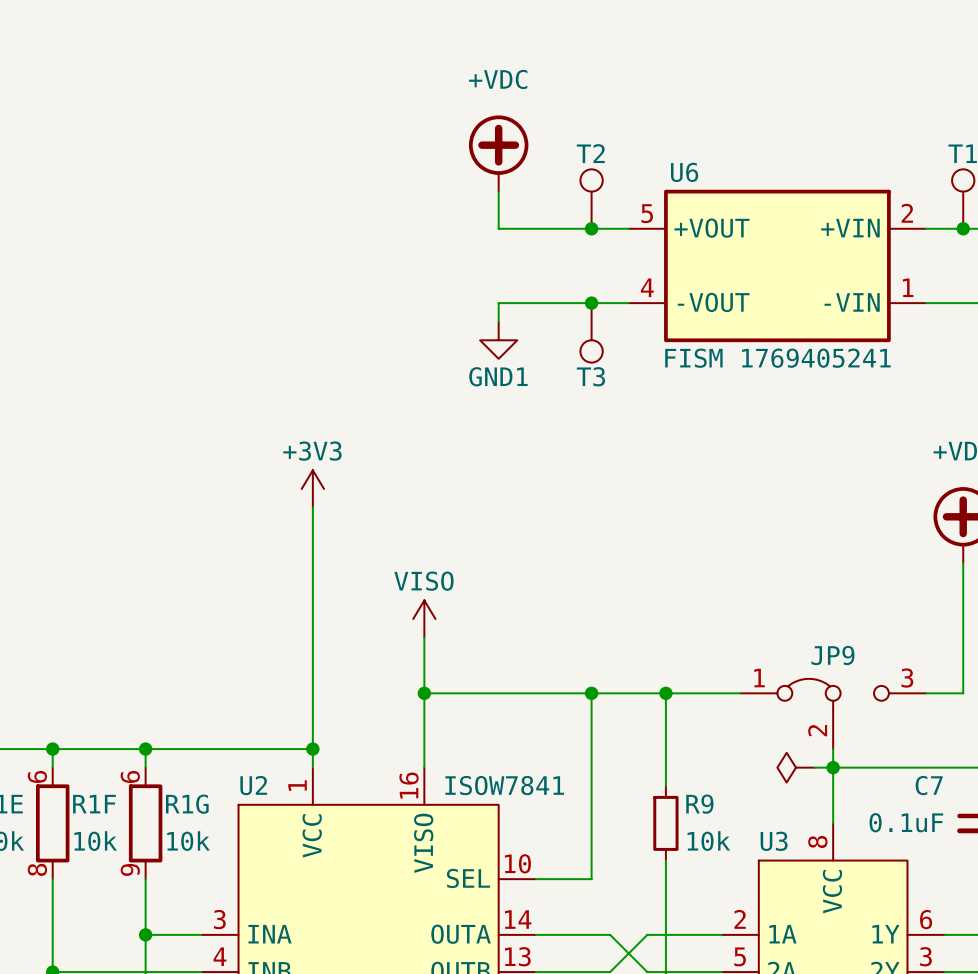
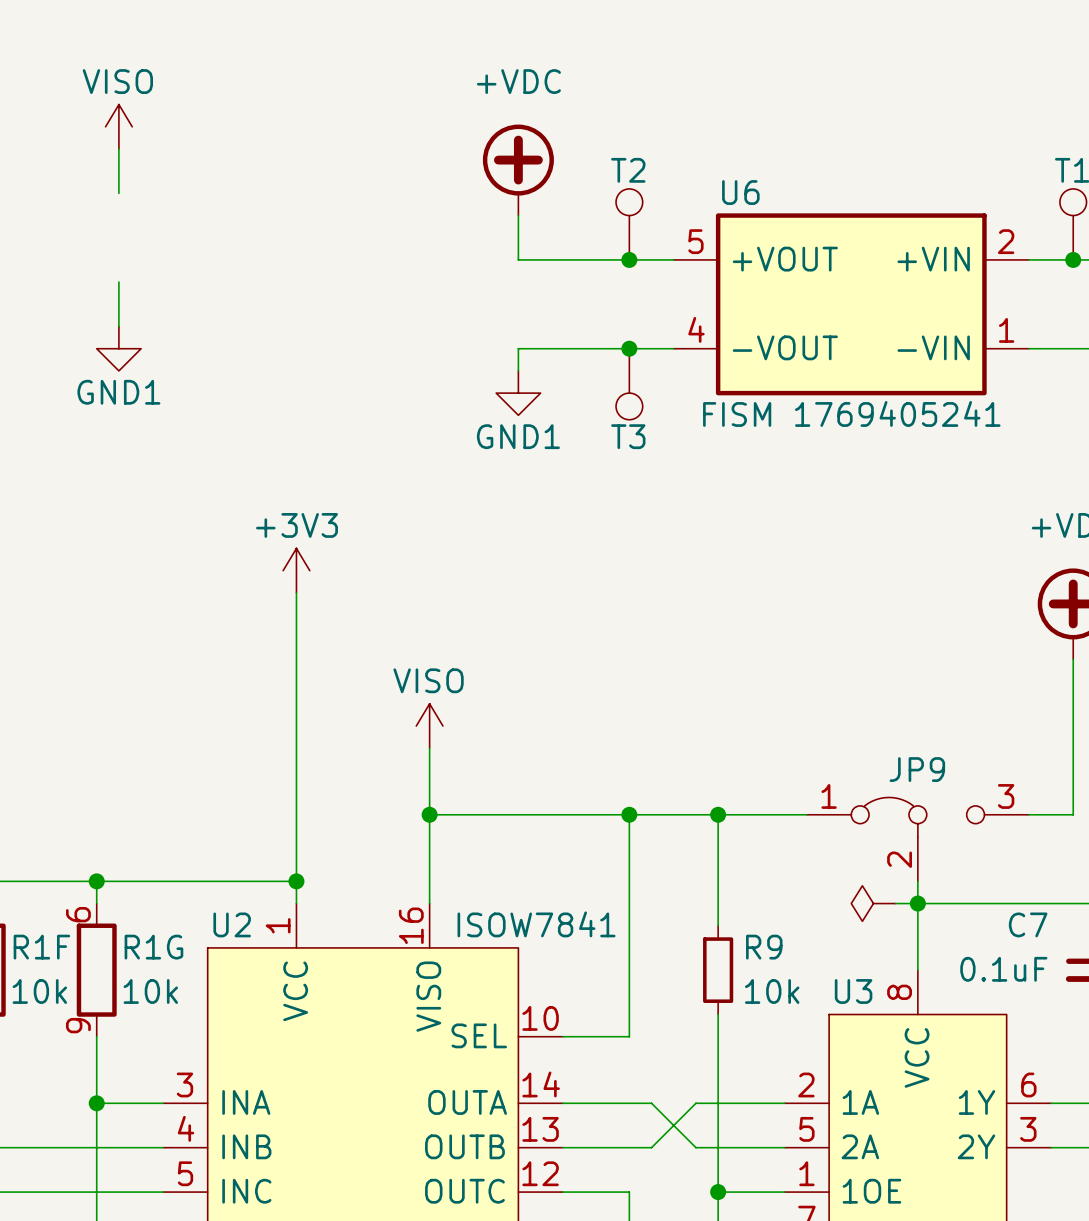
power symbol: none -> VISO (118, 126)
wire: none -> (118, 148) (118, 193)
wire: none -> (118, 282) (118, 326)
power symbol: none -> GND1 (118, 348)

